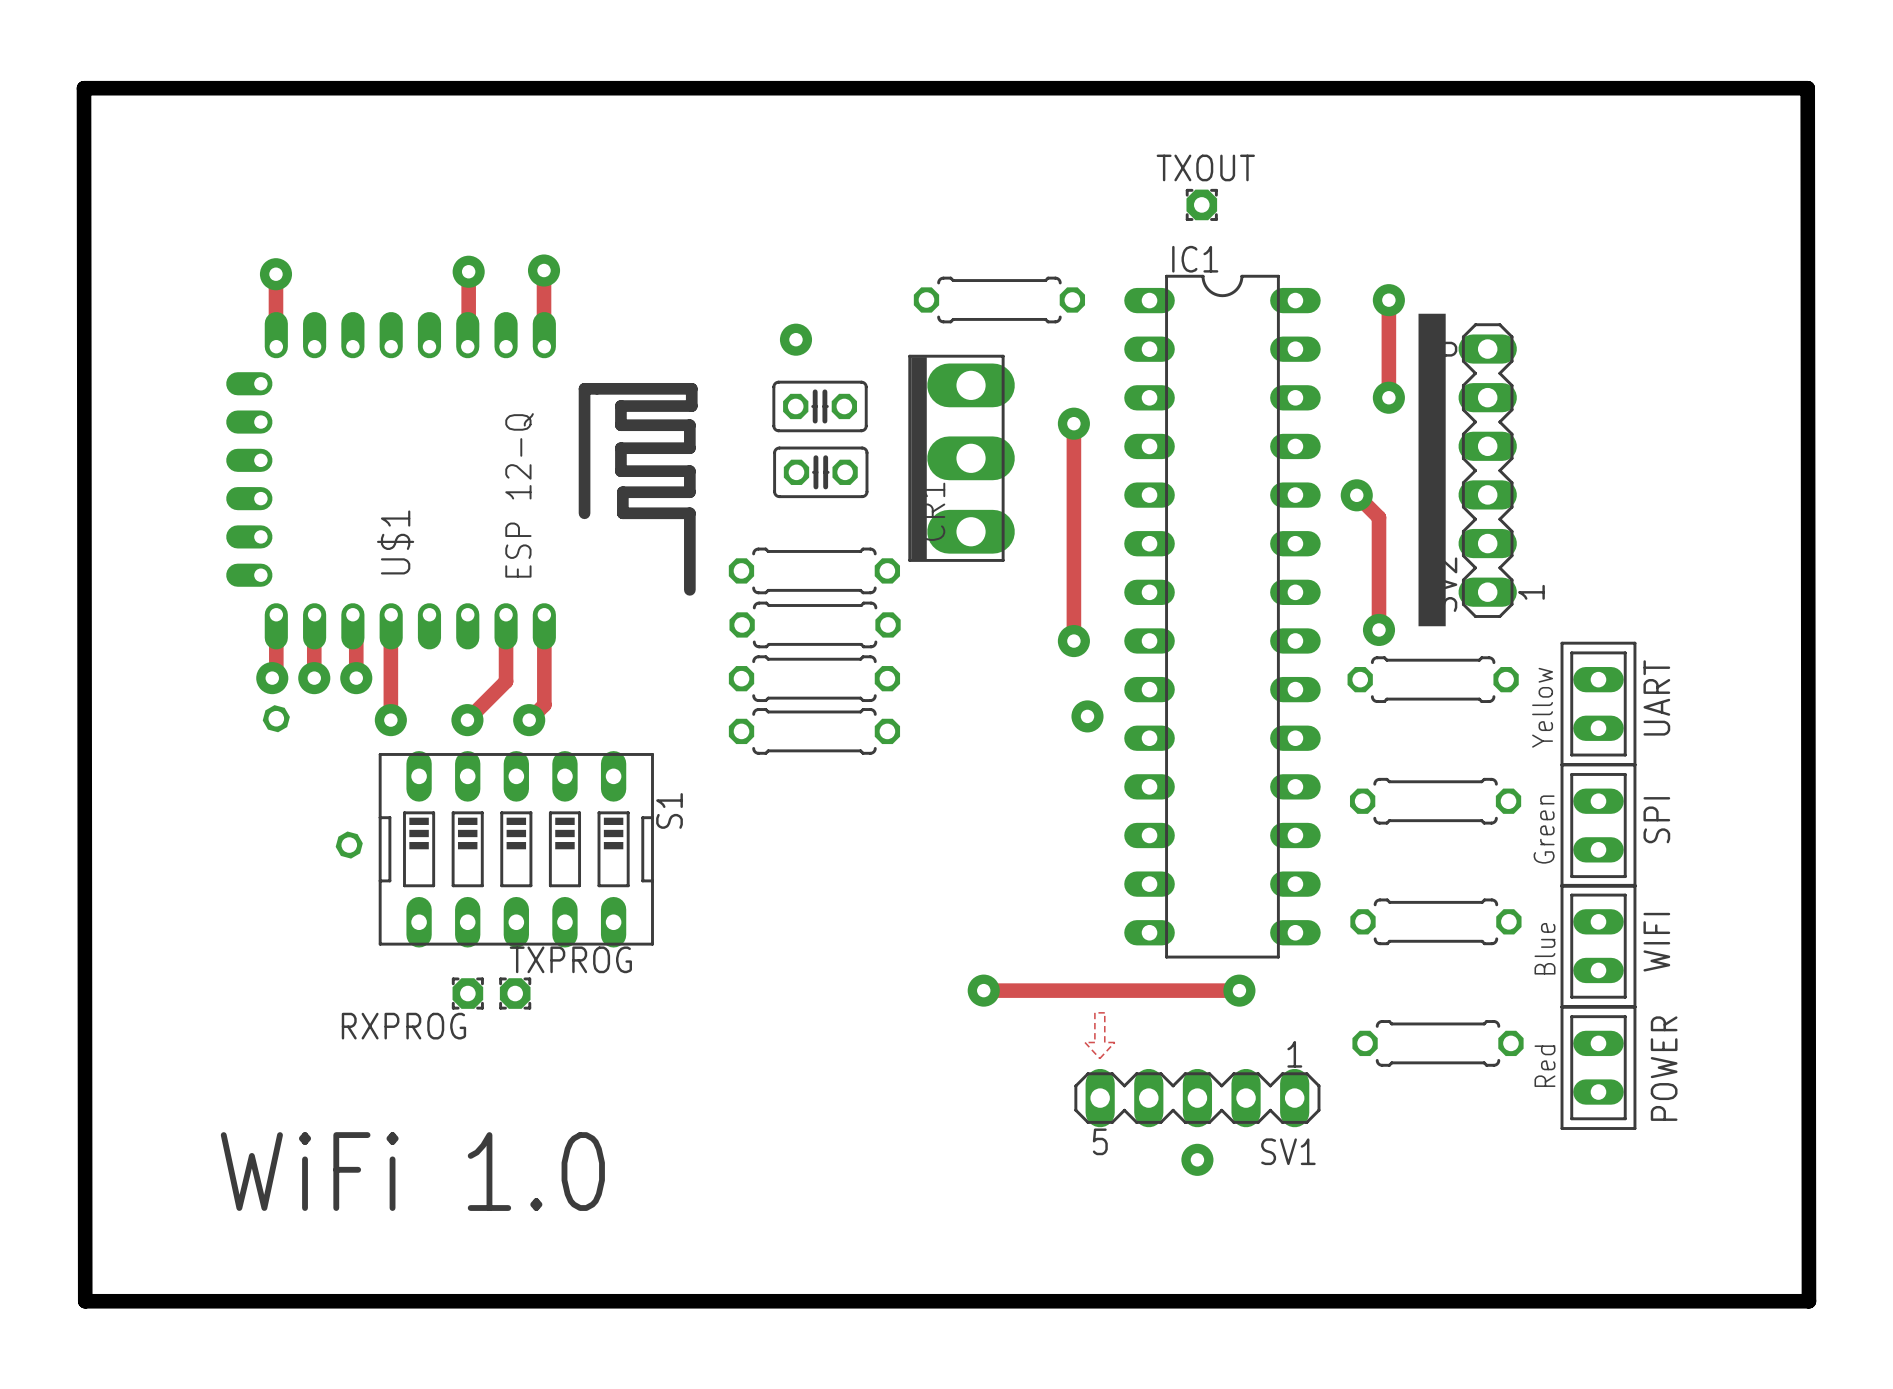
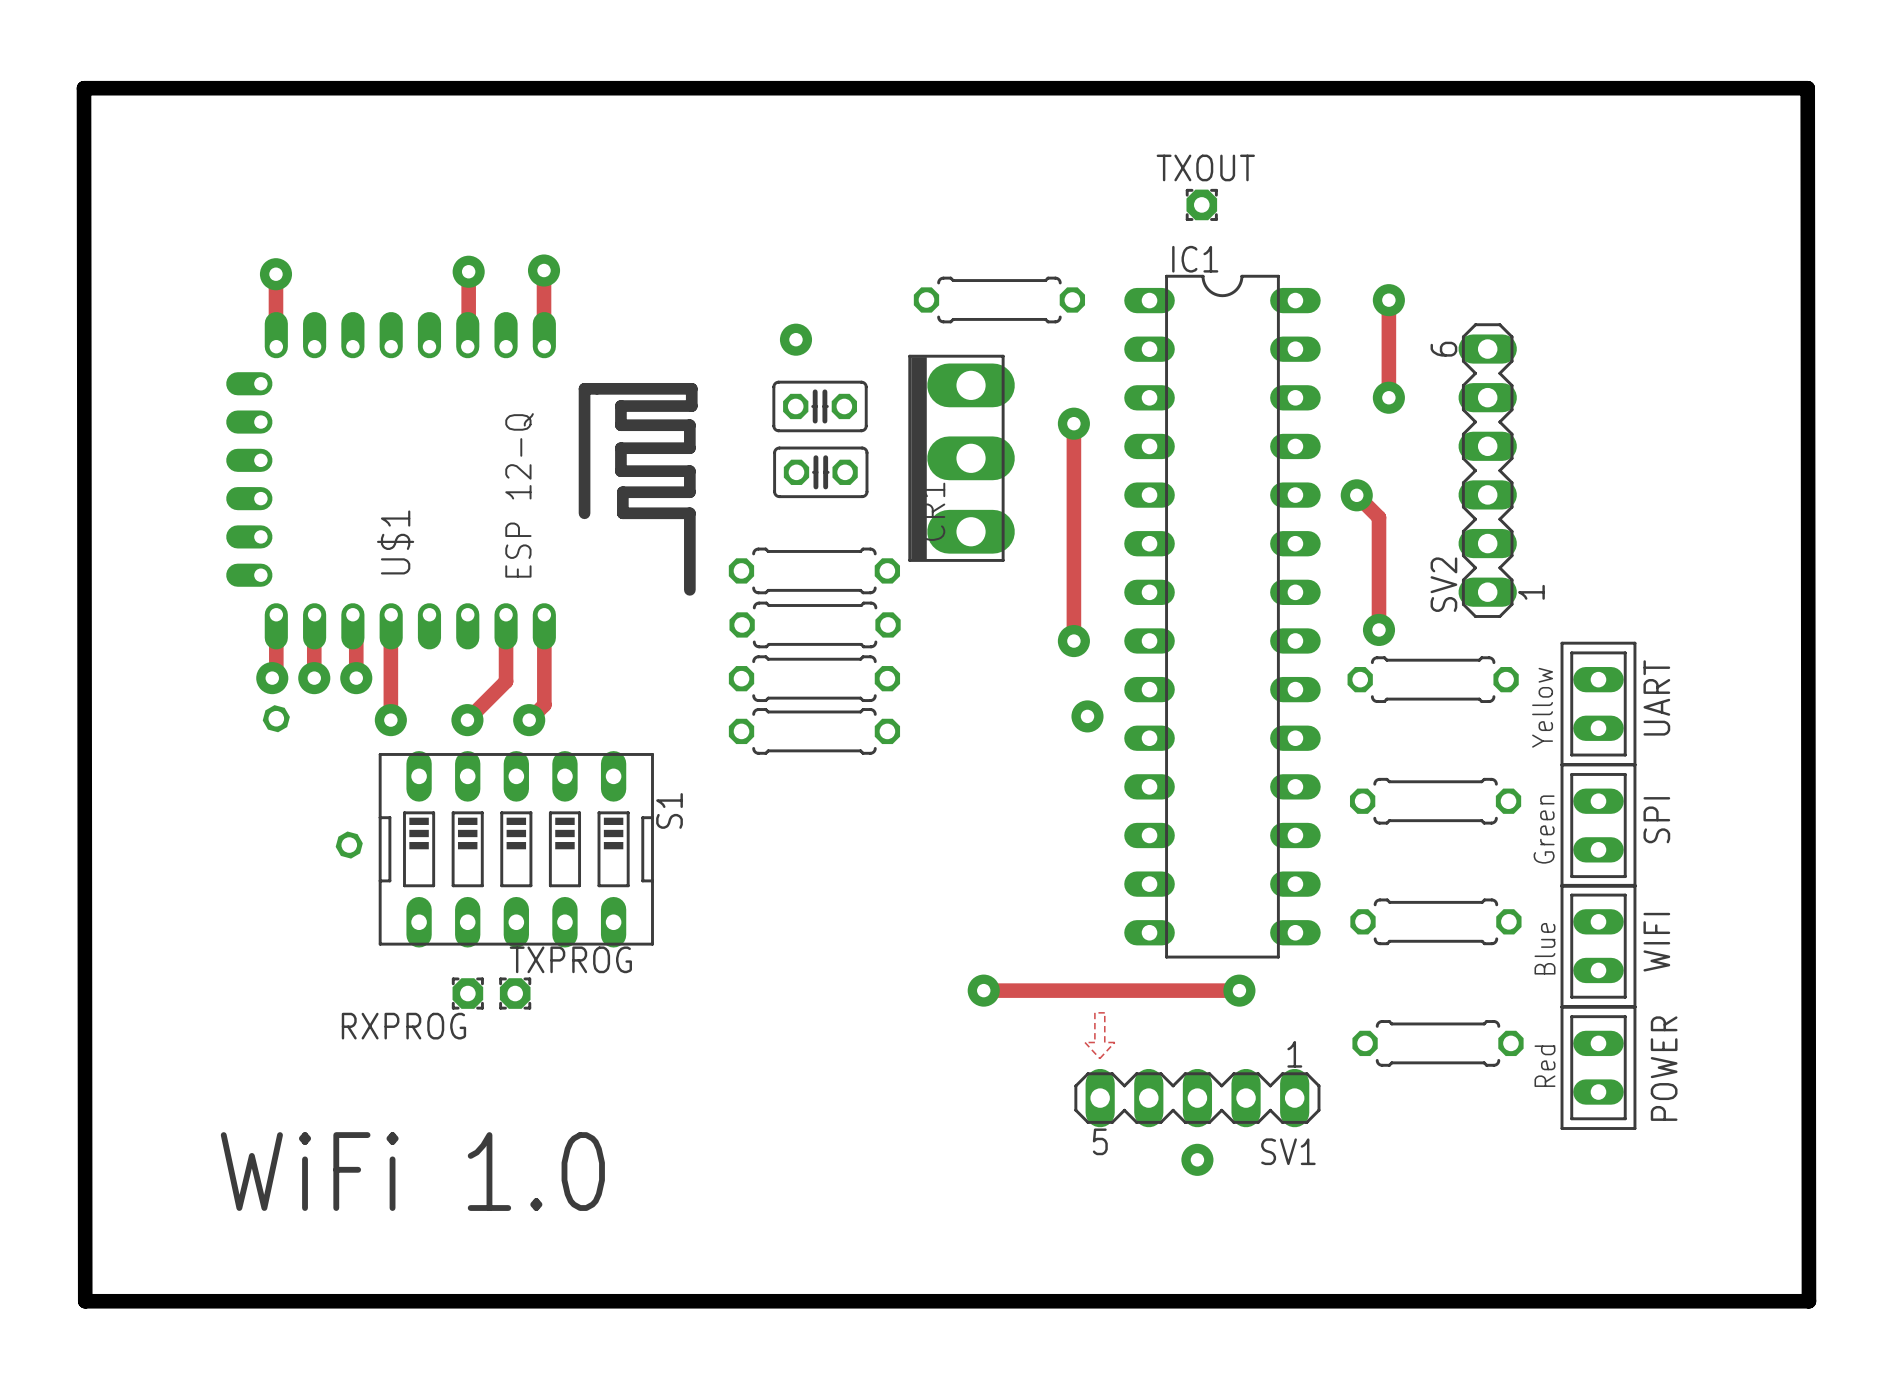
drawing: [1418, 313, 1446, 627] -> none

